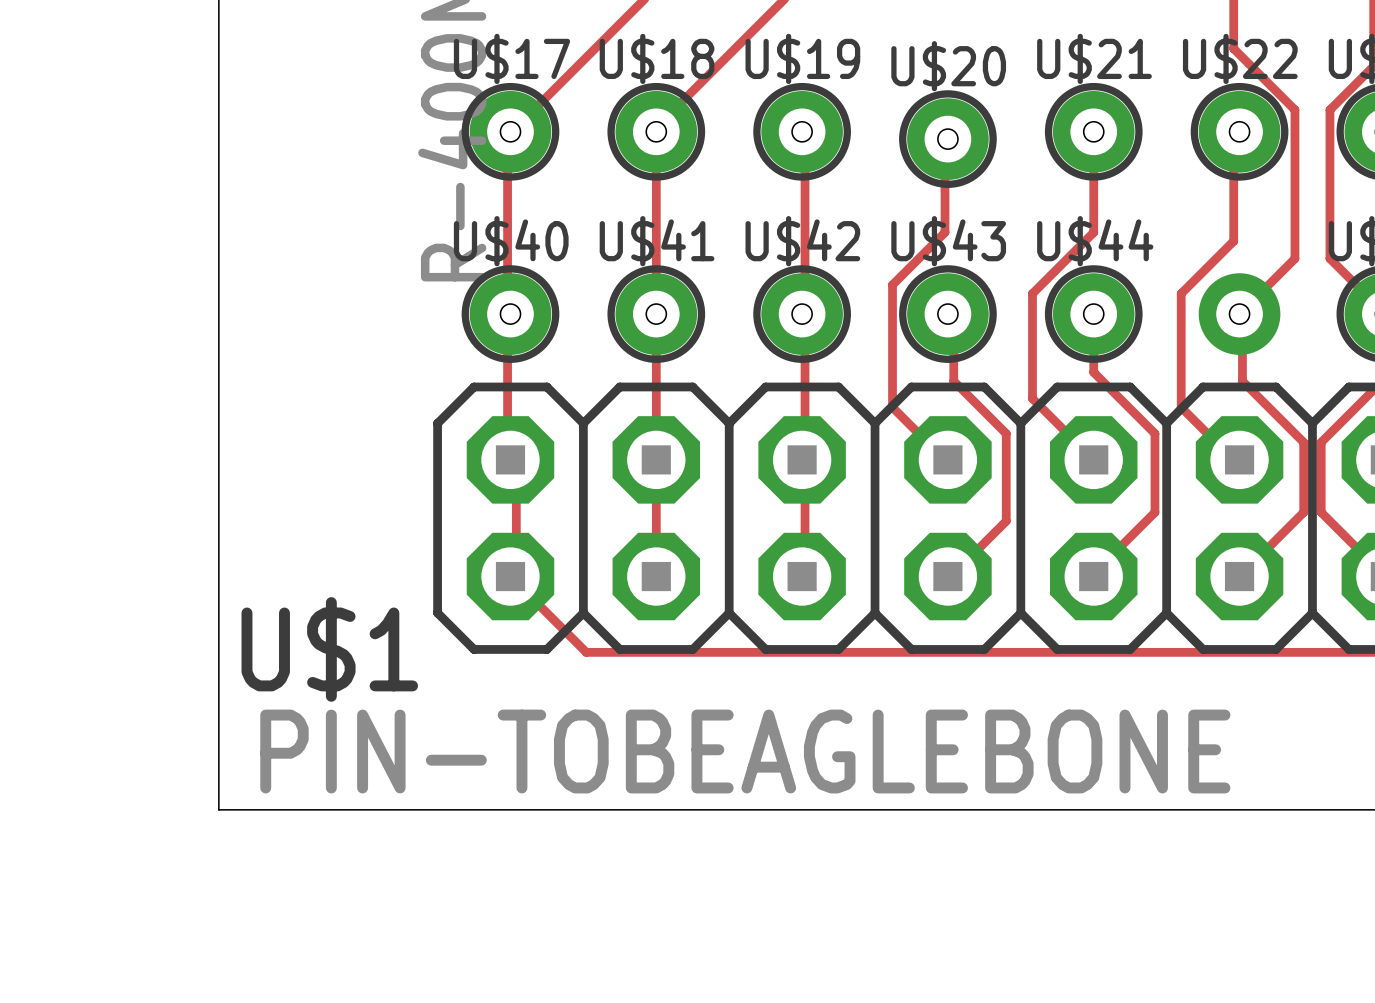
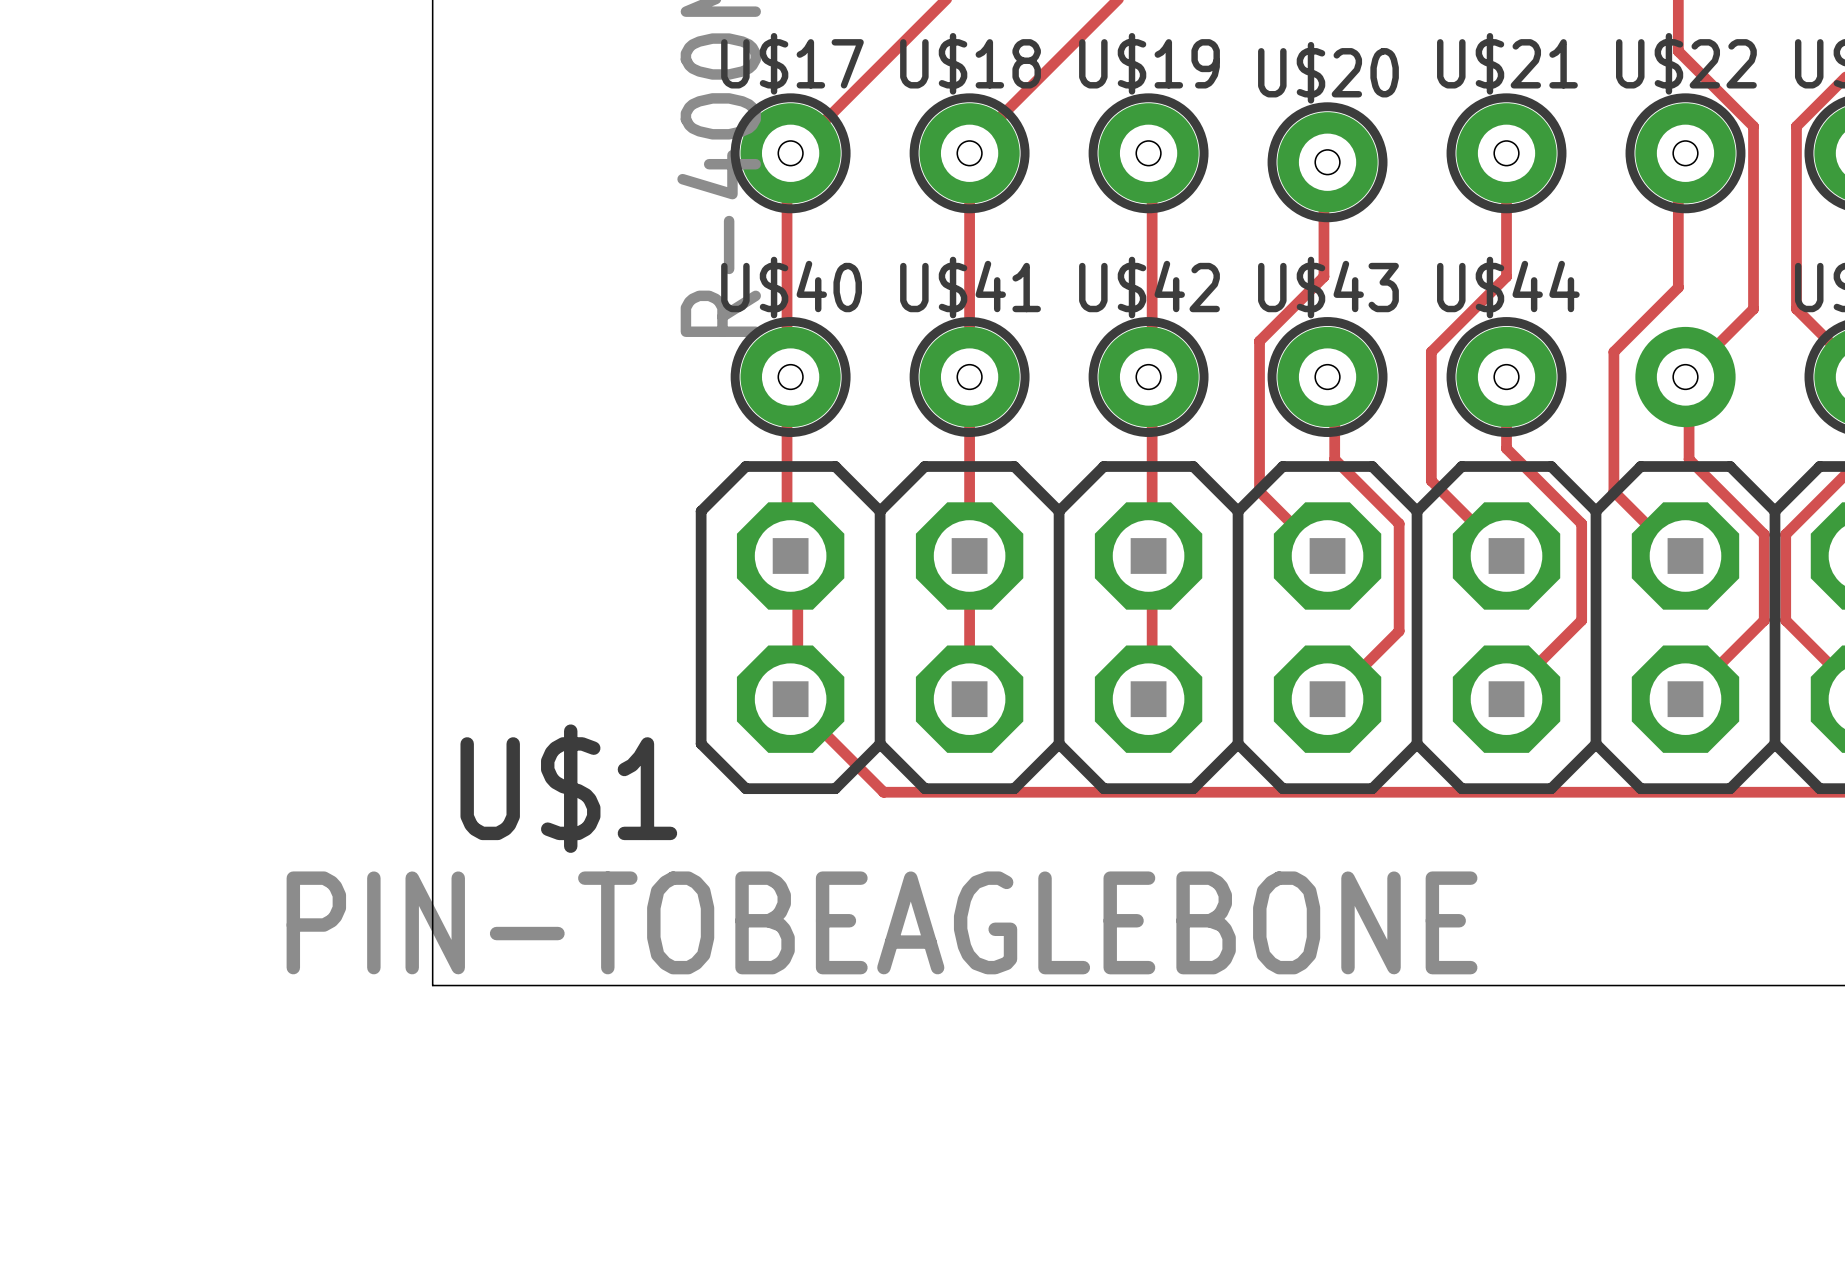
U$1 value position: PIN-TOBEAGLEBONE (745, 751) -> PIN-TOBEAGLEBONE (882, 922)

